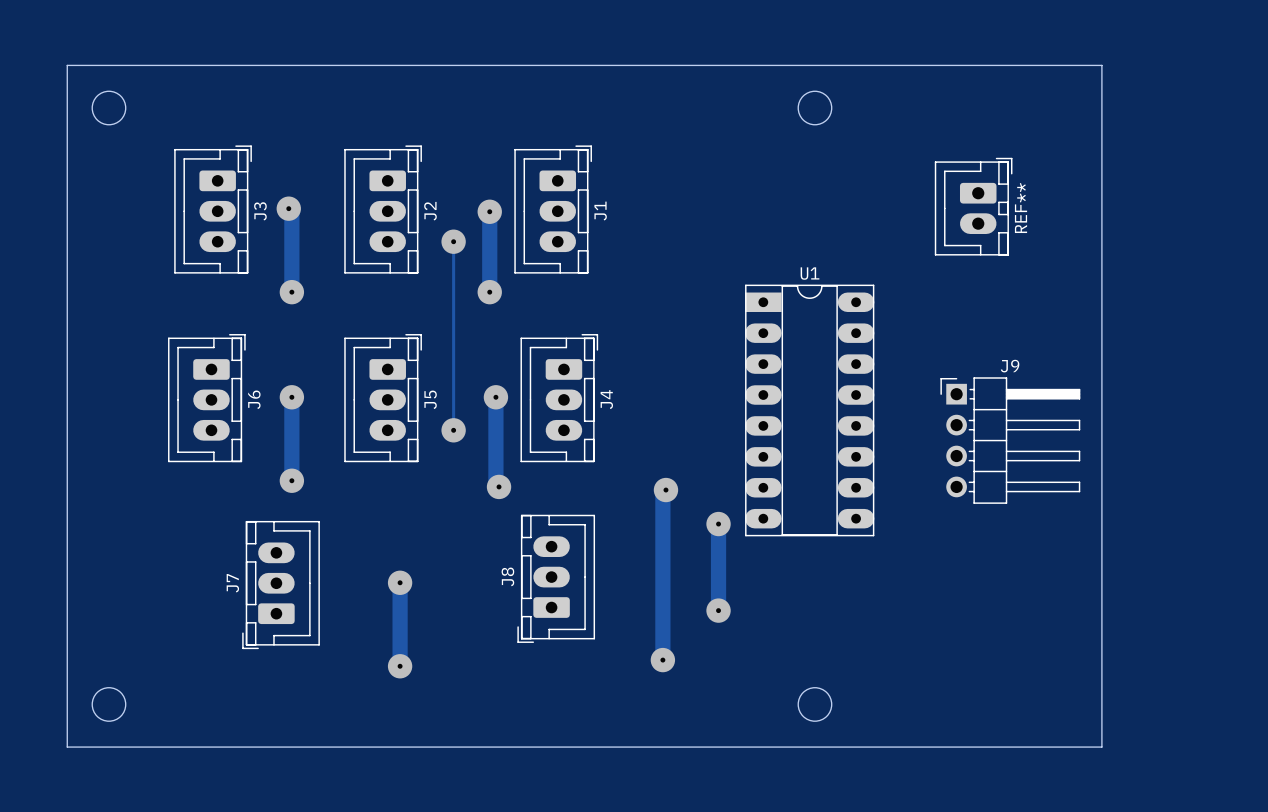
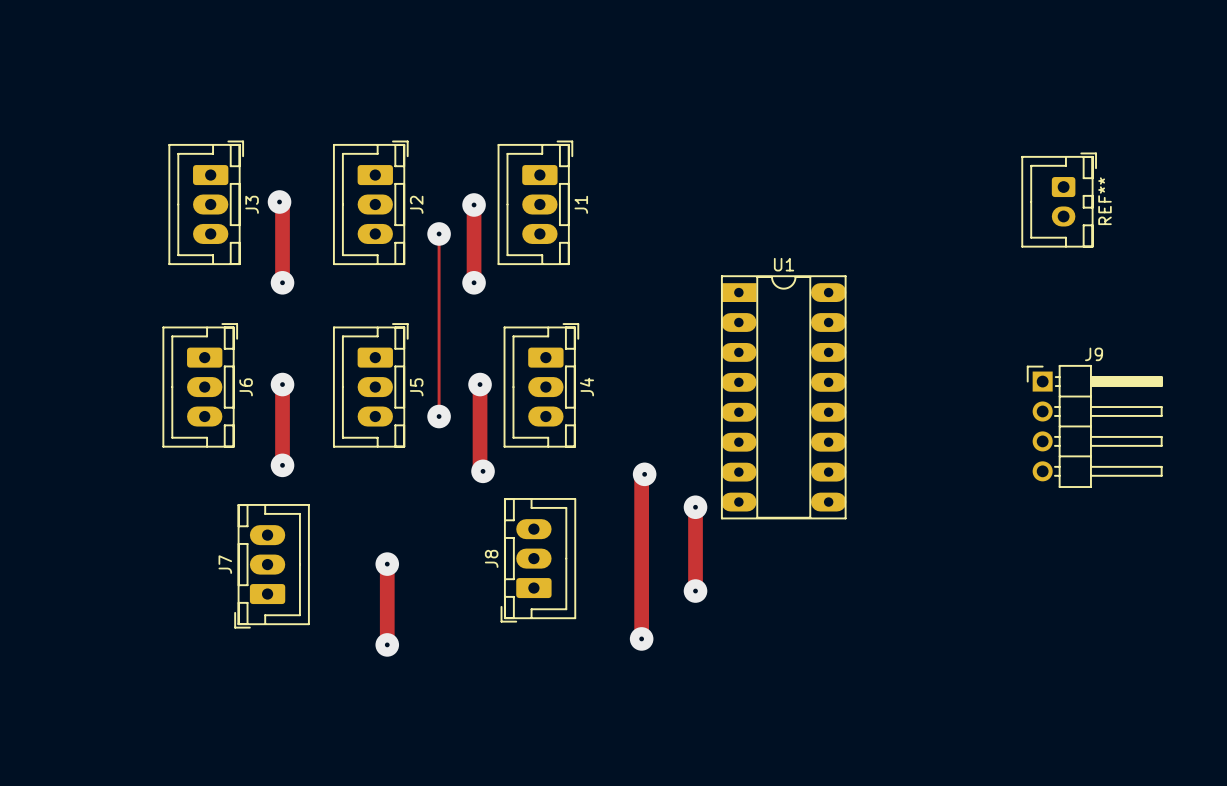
board edge: (67, 65) (67, 747) (1101, 747) (1101, 65) (67, 65) -> none
round board edge: [91, 90, 127, 126] -> none
round board edge: [797, 90, 833, 126] -> none
REF**: (973, 206) -> none
REF**: none -> (1059, 200)
J9 position: (1010, 440) -> (1094, 426)
round board edge: [91, 687, 127, 722] -> none
round board edge: [797, 687, 833, 722] -> none

